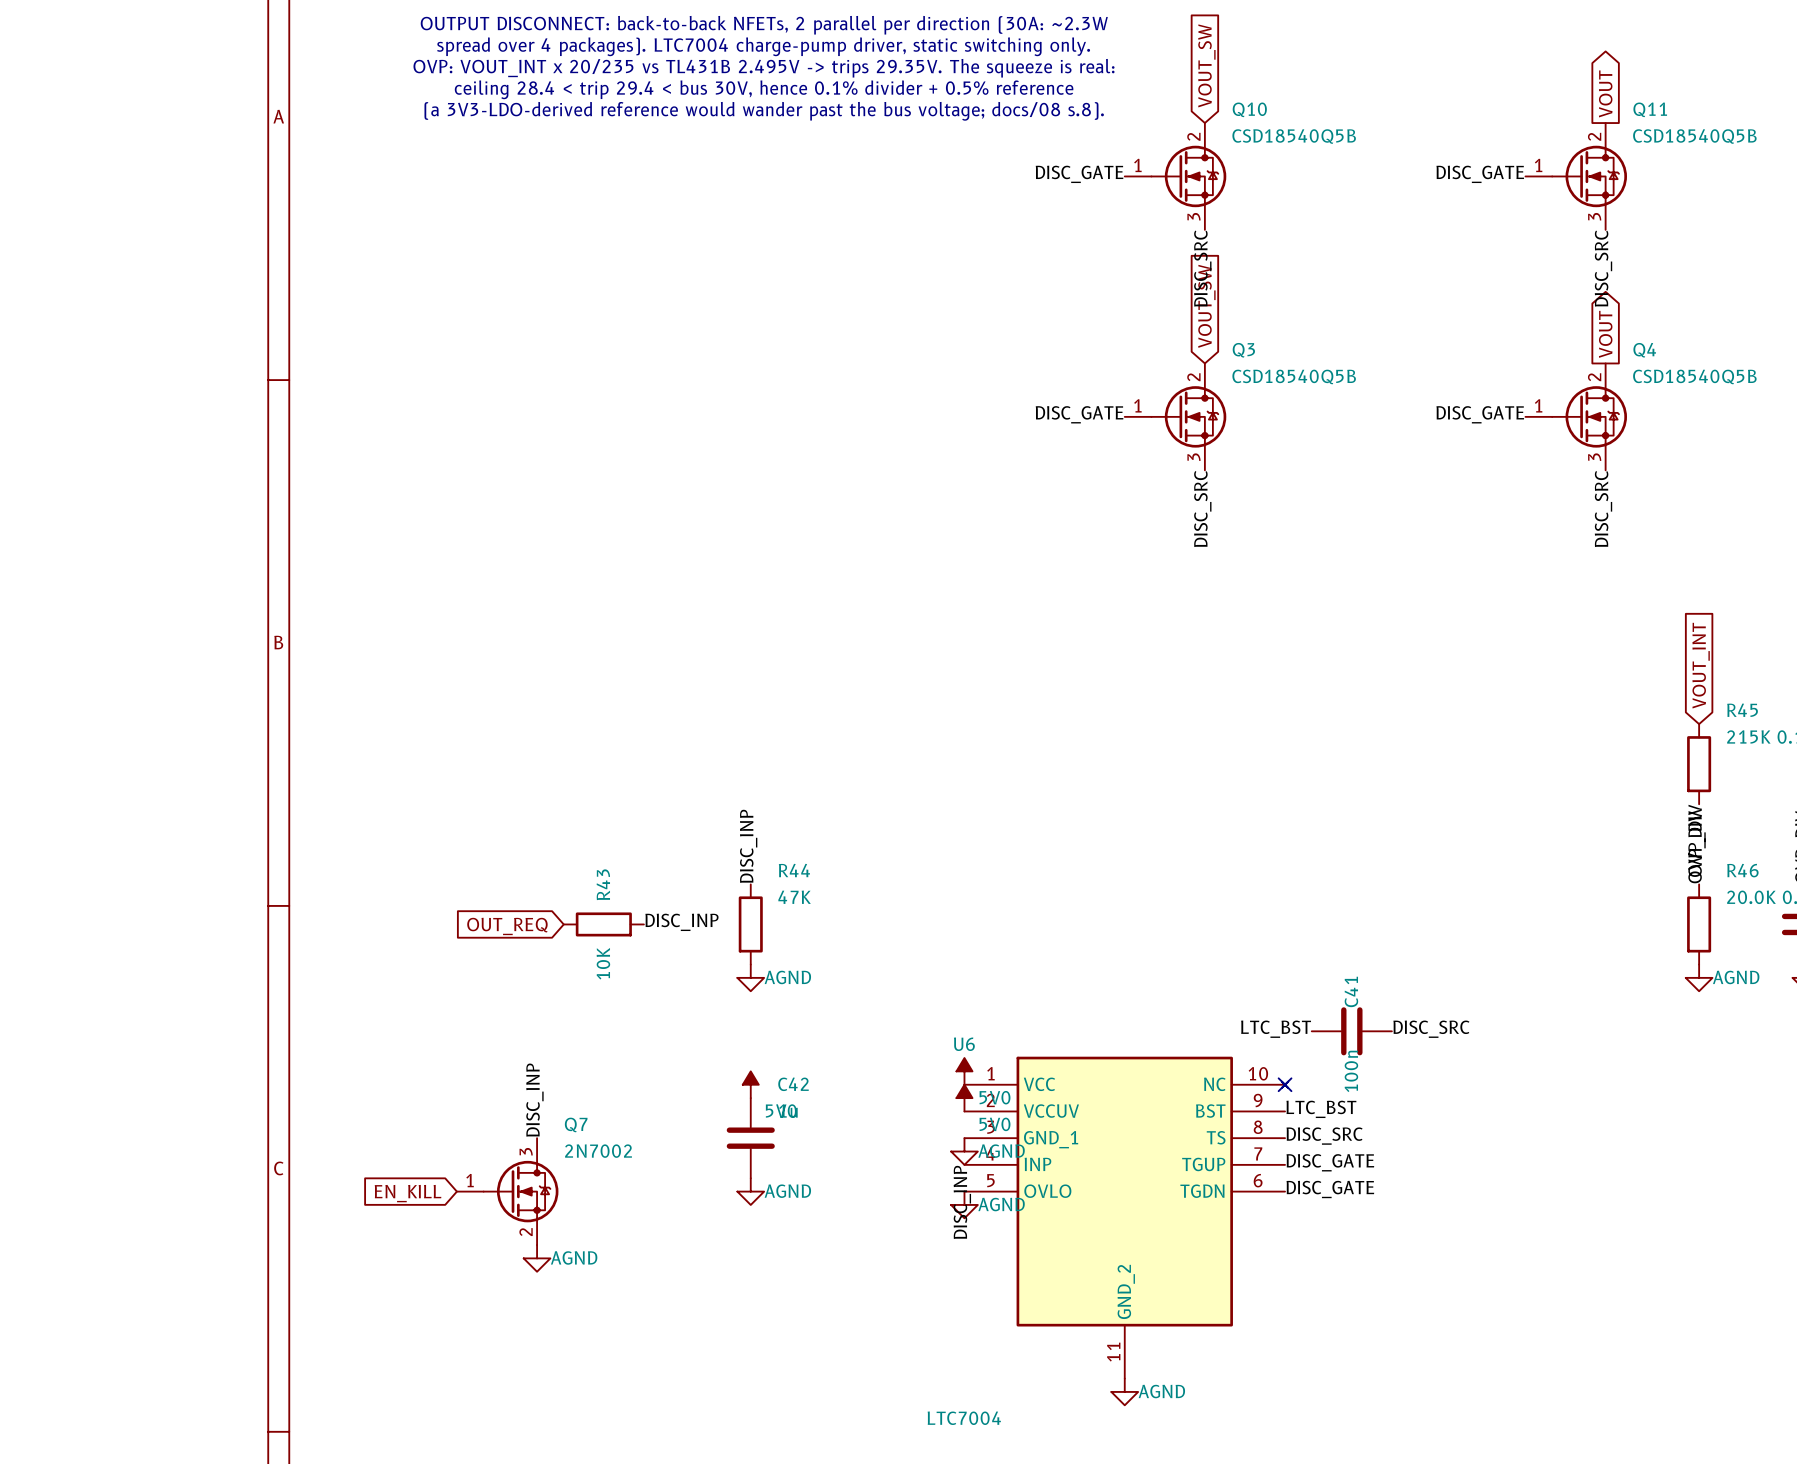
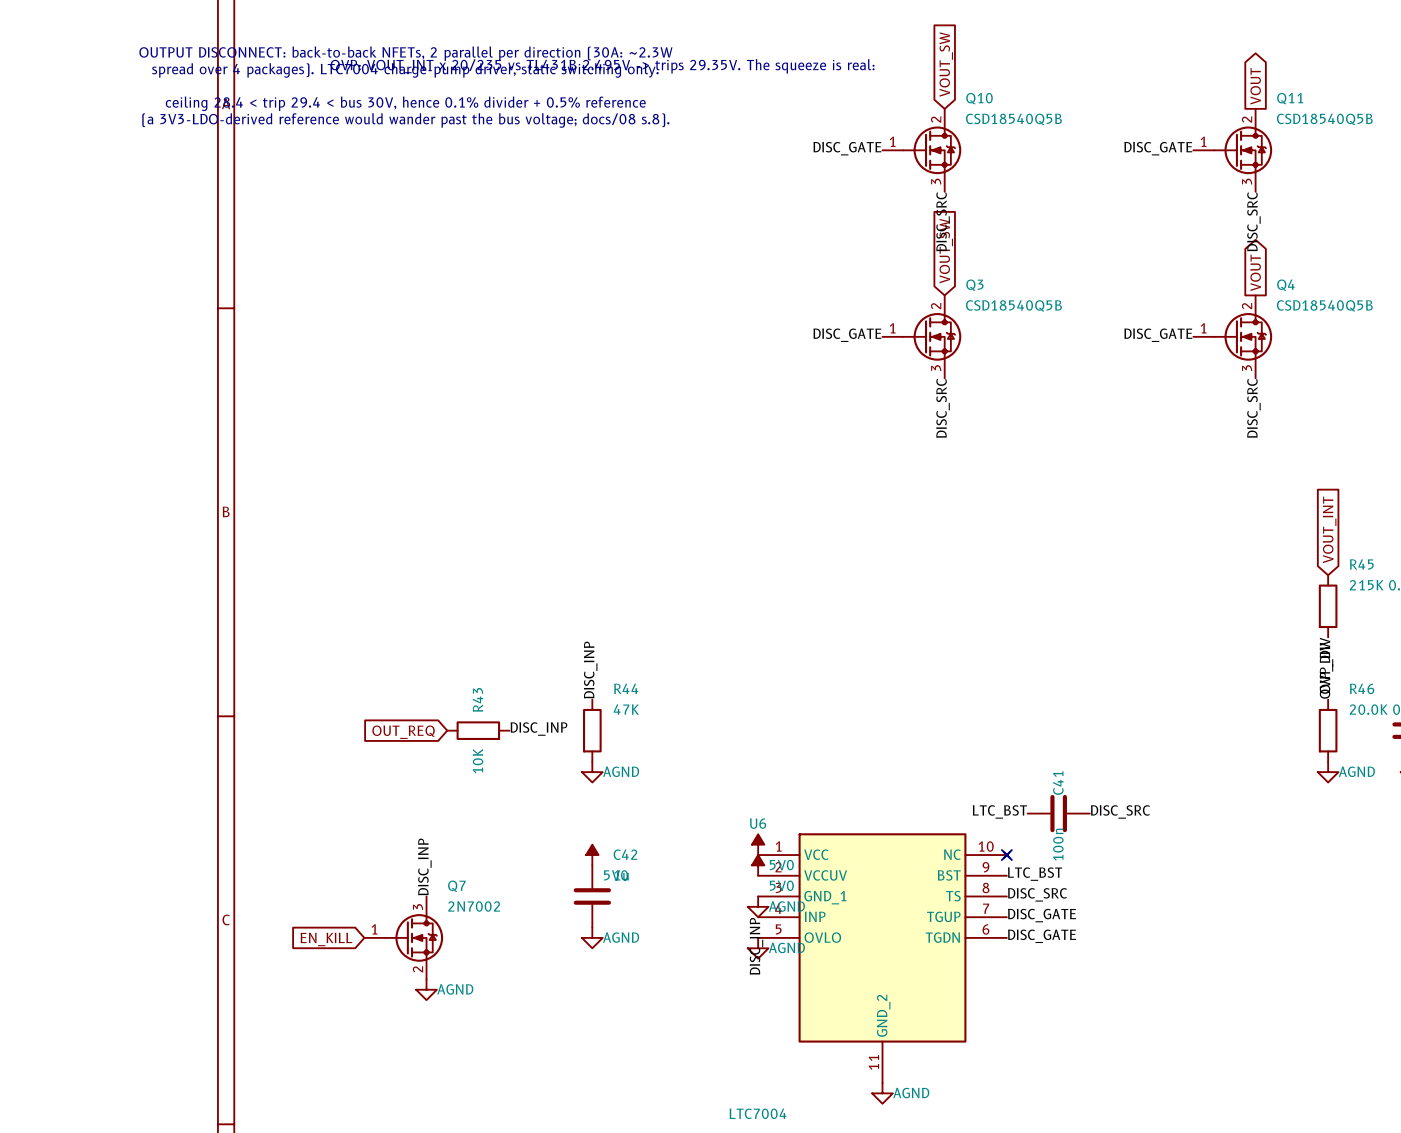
text position: OUTPUT DISCONNECT: back-to-back NFETs, 2 parallel per direction (30A: ~2.3W (764, 25) -> OUTPUT DISCONNECT: back-to-back NFETs, 2 parallel per direction (30A: ~2.3W (405, 53)
text position: spread over 4 packages). LTC7004 charge-pump driver, static switching only. (763, 46) -> spread over 4 packages). LTC7004 charge-pump driver, static switching only. (405, 70)
text position: ceiling 28.4 < trip 29.4 < bus 30V, hence 0.1% divider + 0.5% reference (764, 89) -> ceiling 28.4 < trip 29.4 < bus 30V, hence 0.1% divider + 0.5% reference (405, 103)
text position: (a 3V3-LDO-derived reference would wander past the bus voltage; docs/08 s.8). (764, 111) -> (a 3V3-LDO-derived reference would wander past the bus voltage; docs/08 s.8). (405, 120)

